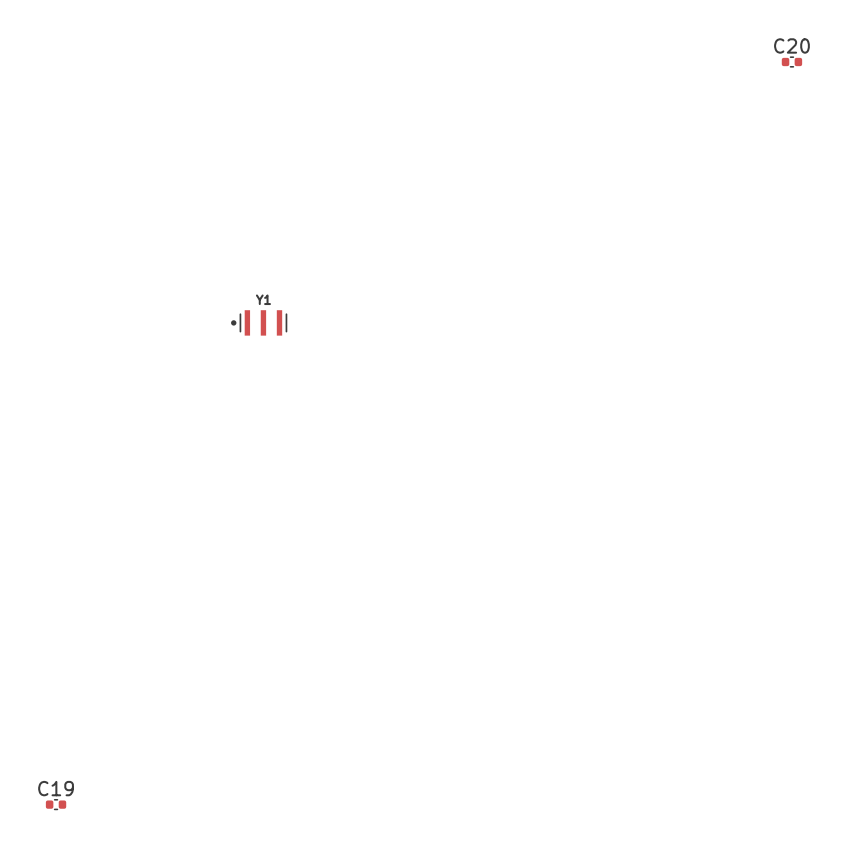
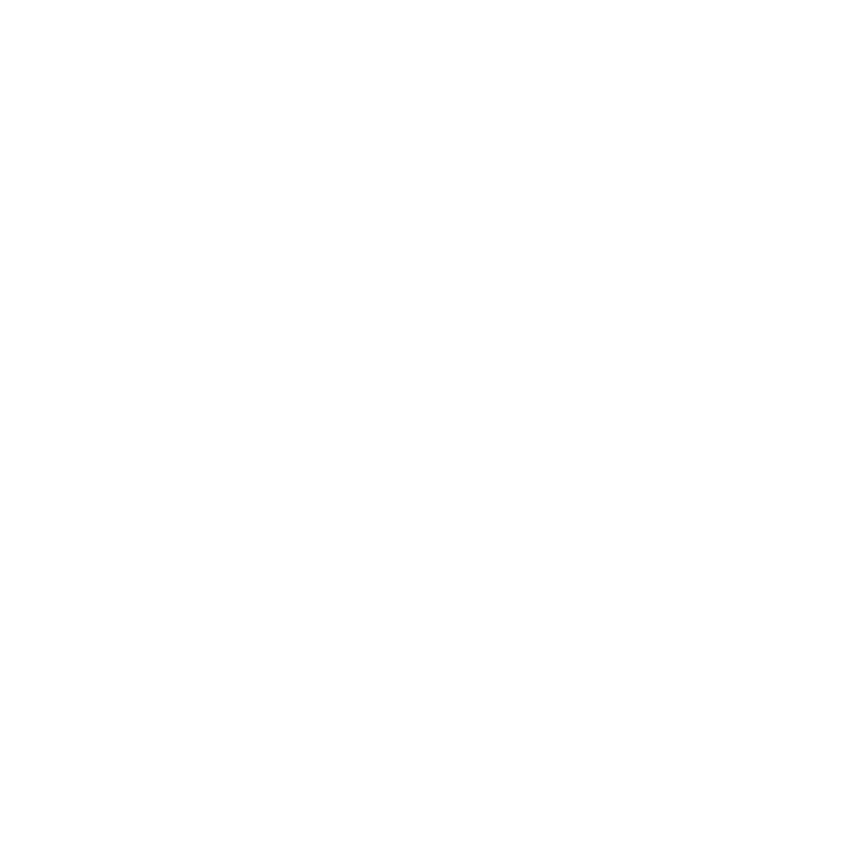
C20: (791, 61) -> none
Y1: (259, 322) -> none
C19: (56, 804) -> none

